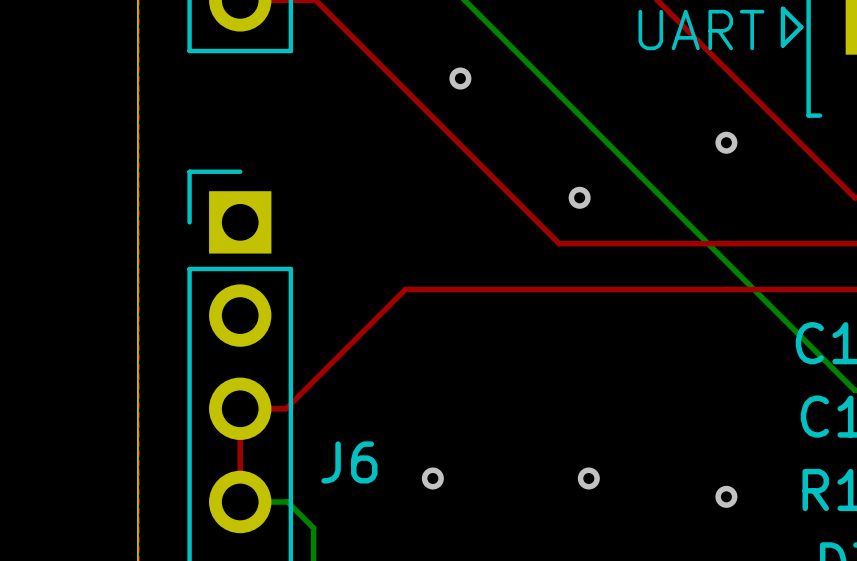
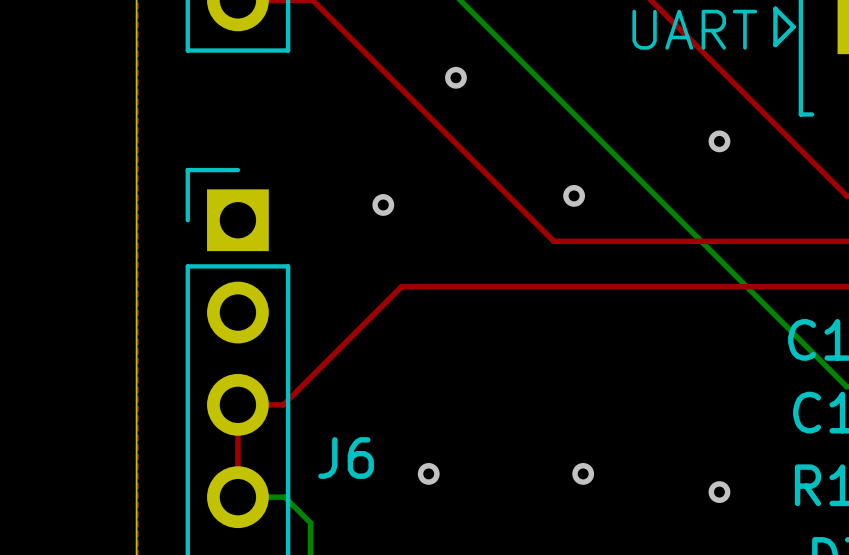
via: none -> (383, 204)

